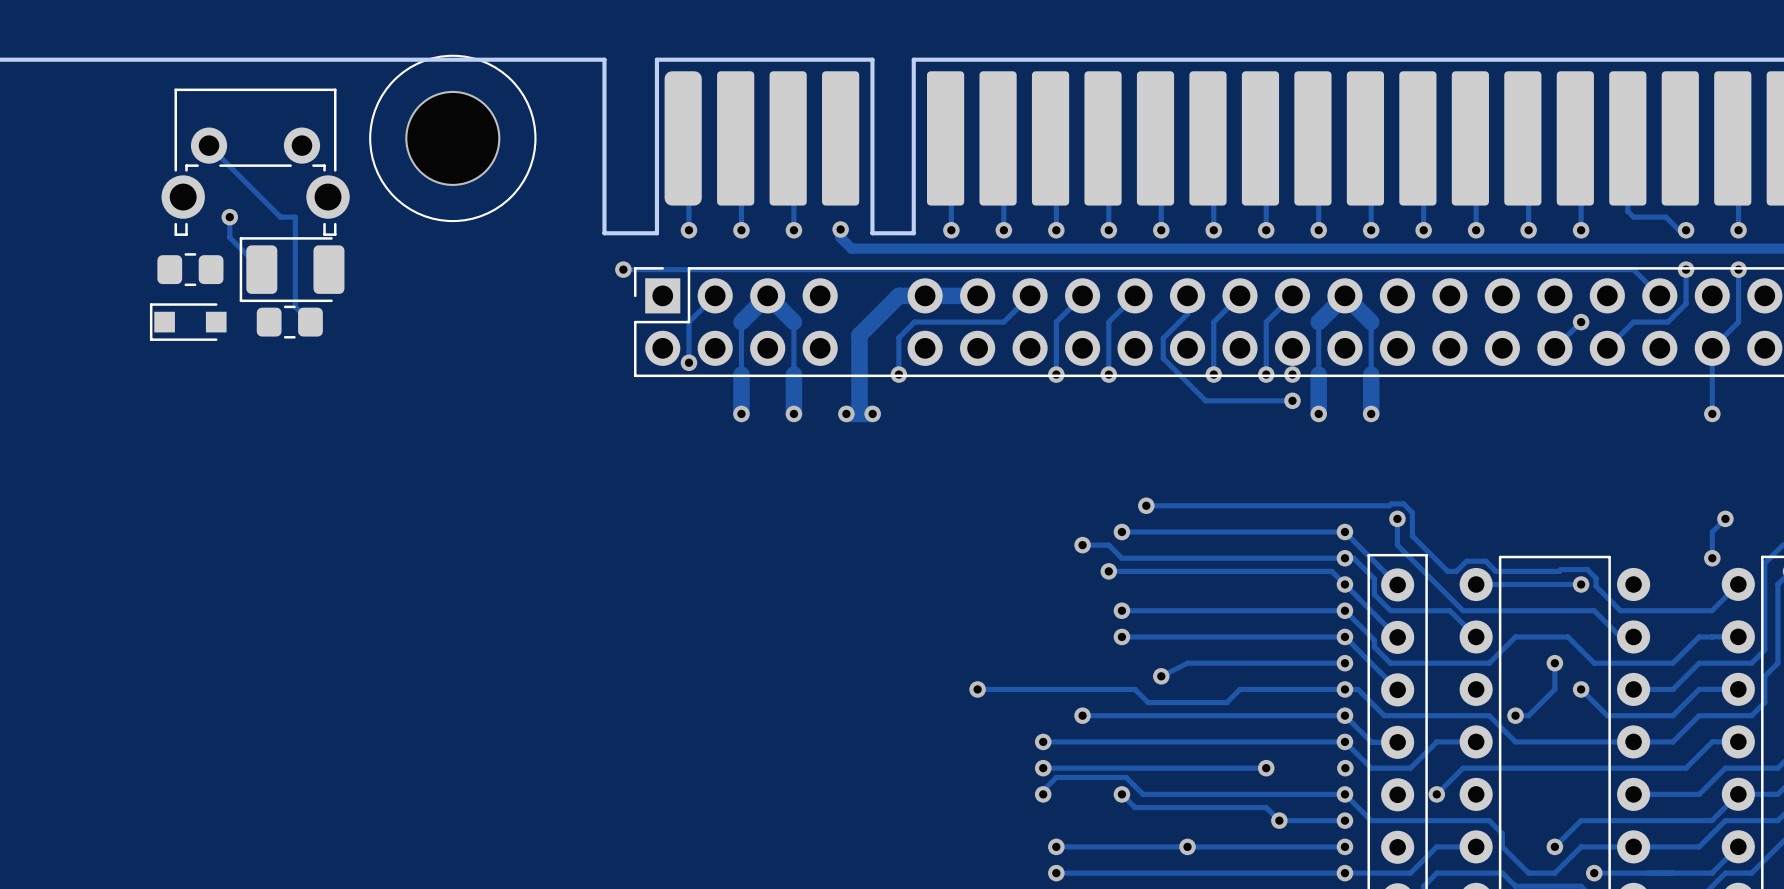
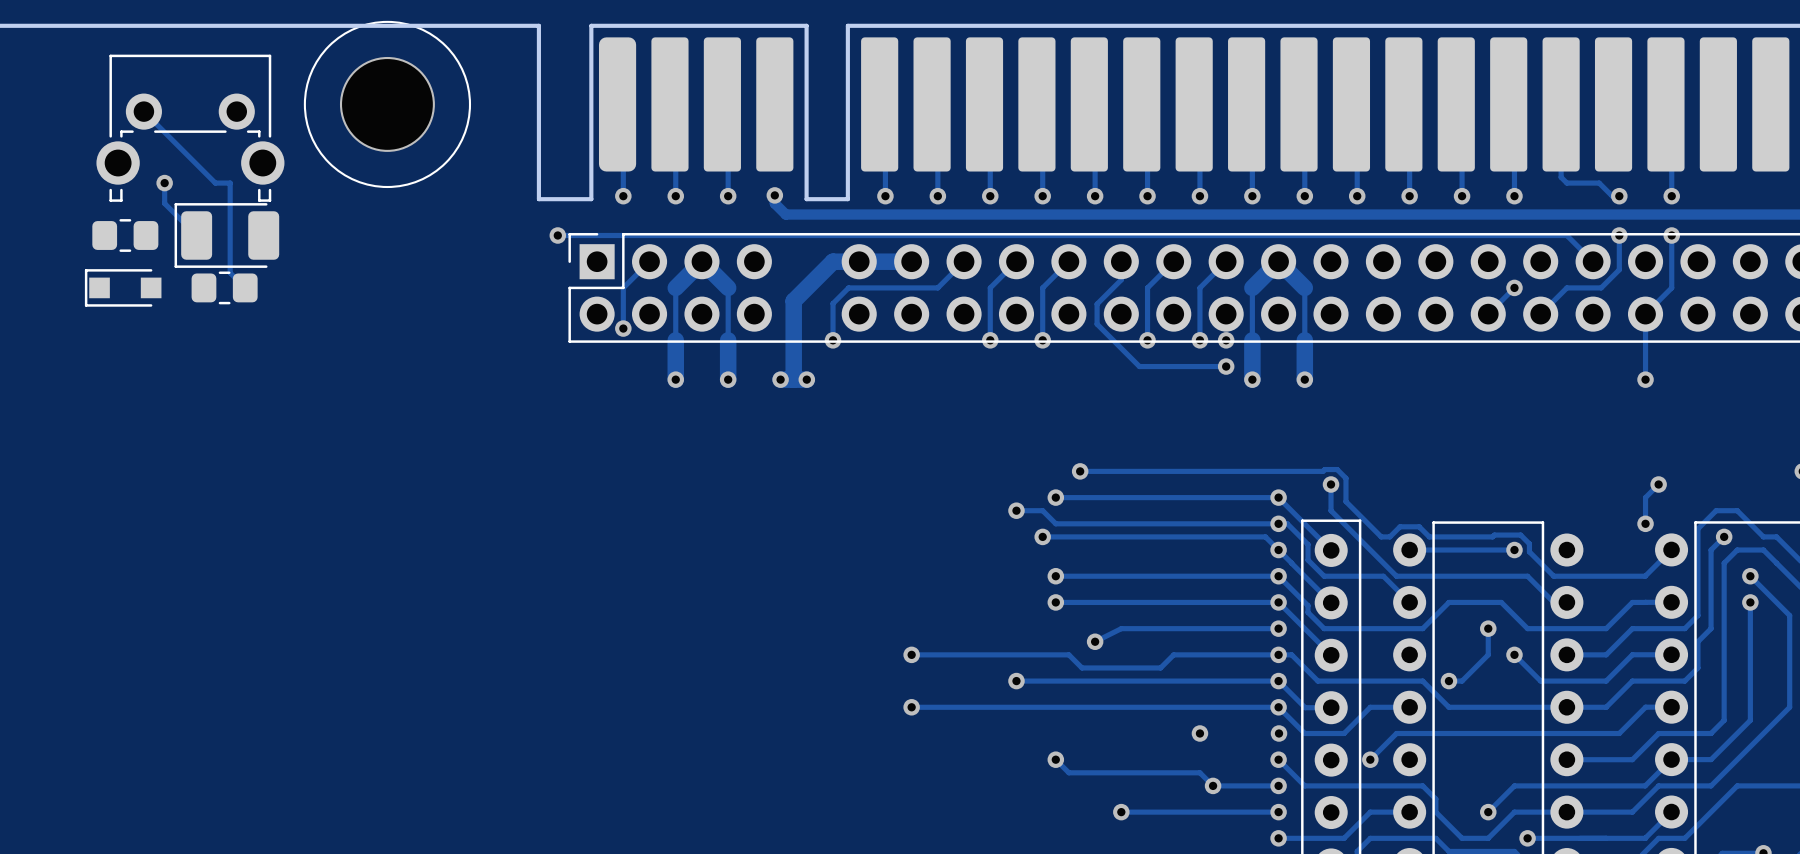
track: none -> (911, 707) (977, 707)
via: none -> (911, 707)
via: (1043, 741) -> none
track: (1043, 768) (1266, 768) -> none
via: (1043, 768) -> none
track: (1043, 794) (1043, 790) (1056, 777) (1126, 777) (1143, 794) (1344, 794) -> none
via: (1043, 794) -> none
track: (1056, 846) (1187, 846) -> none
via: (1056, 846) -> none
track: (1056, 873) (1344, 873) -> none
via: (1056, 873) -> none

